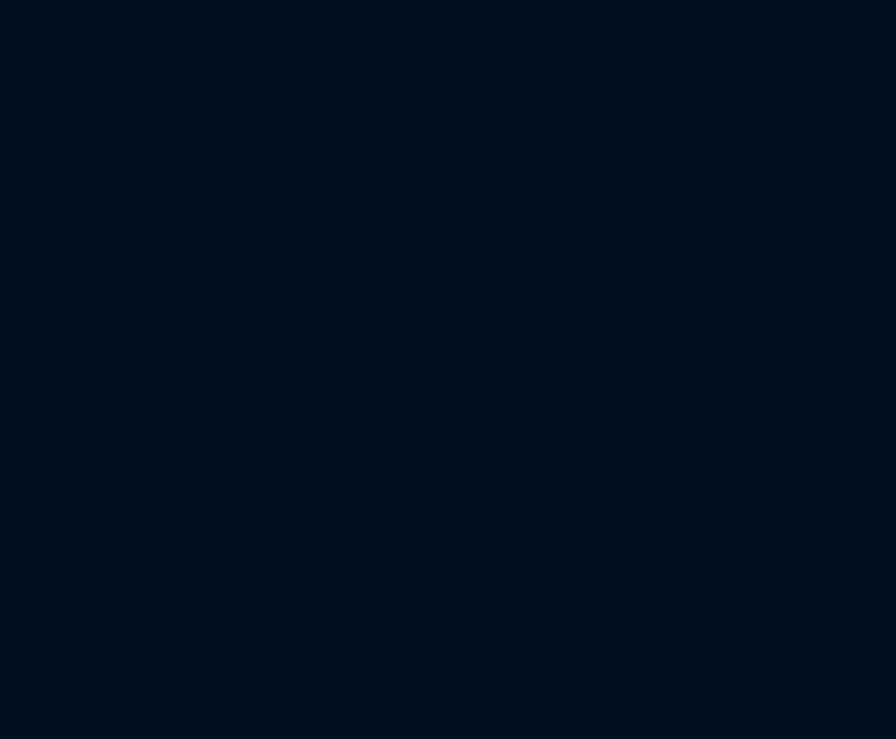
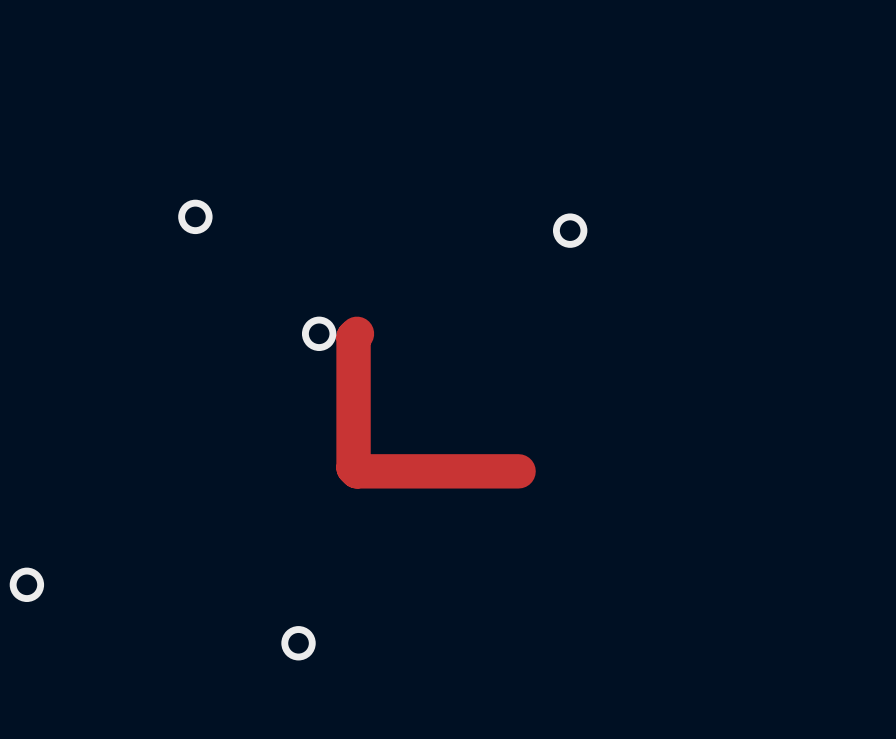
via: none -> (195, 216)
via: none -> (570, 230)
via: none -> (319, 333)
top track: none -> (356, 333) (353, 337) (353, 467) (356, 471) (518, 471)
via: none -> (26, 584)
via: none -> (298, 643)

